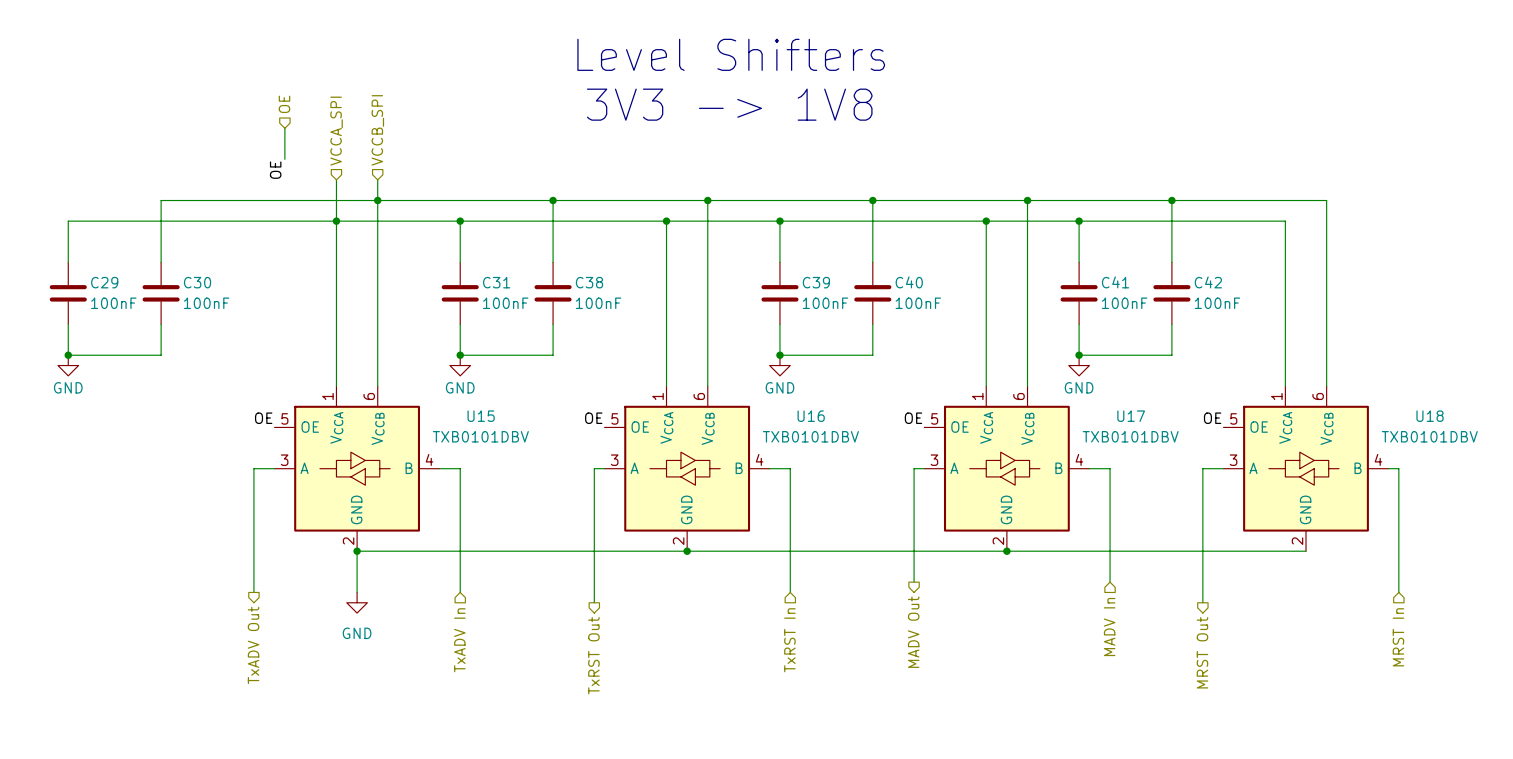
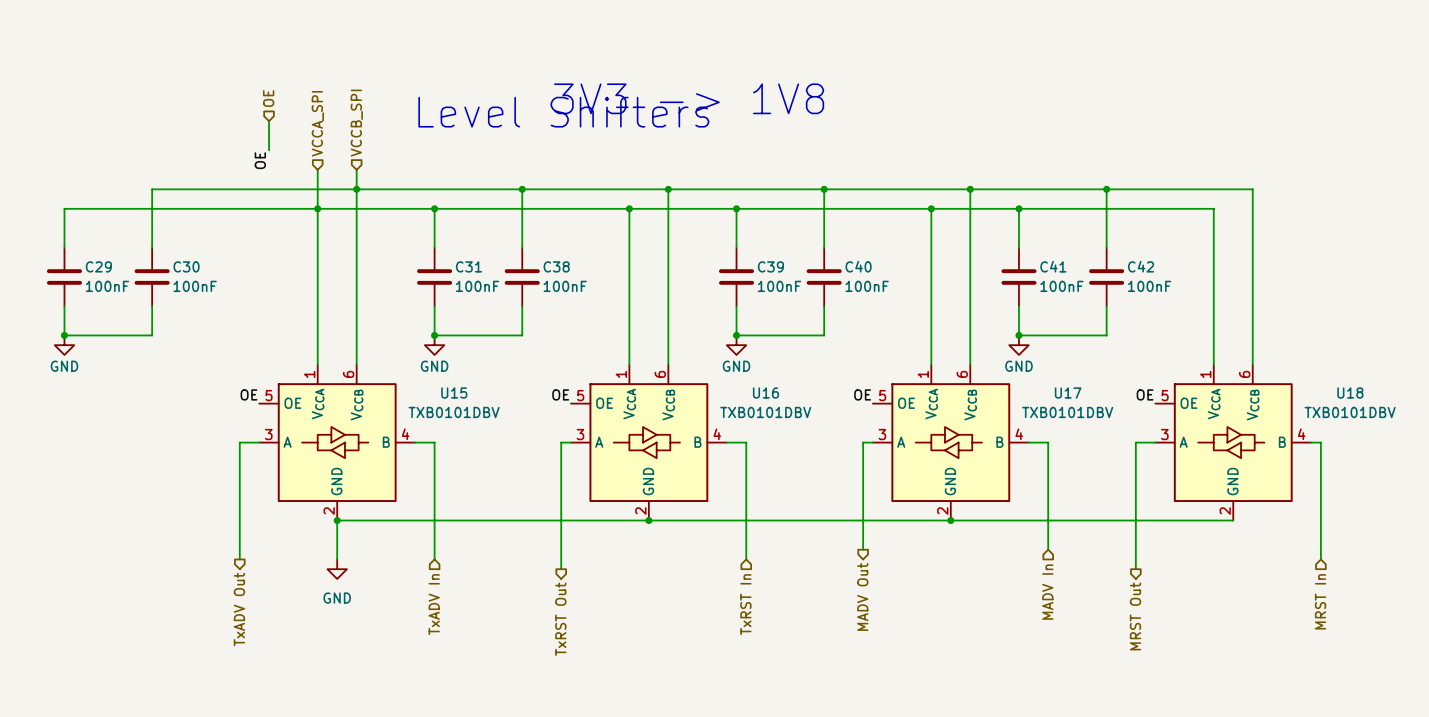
text position: Level Shifters (731, 54) -> Level Shifters (563, 112)

